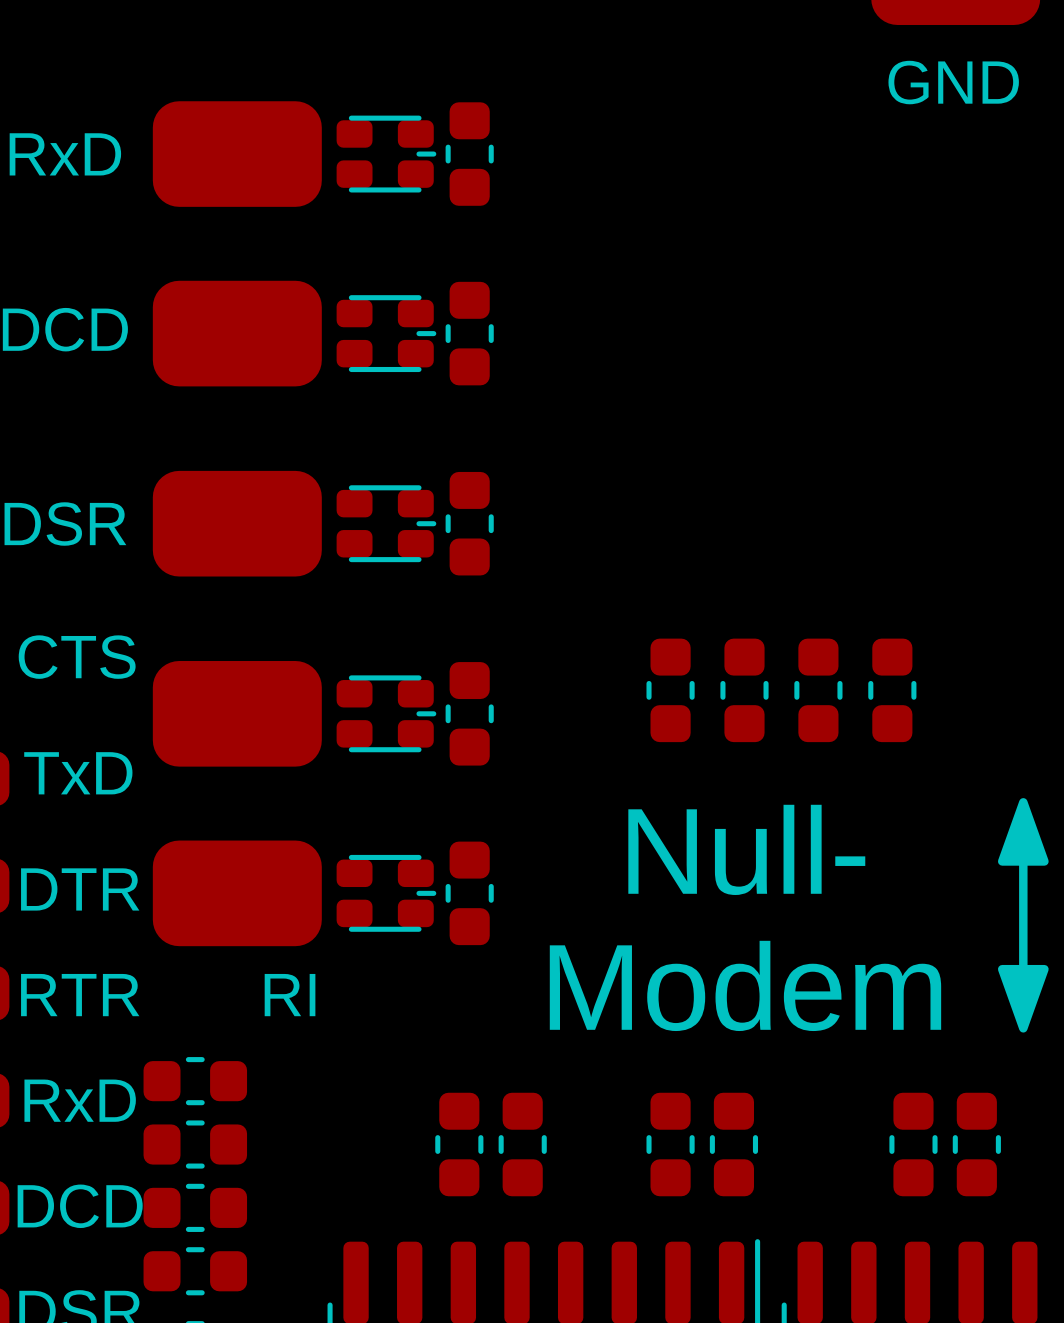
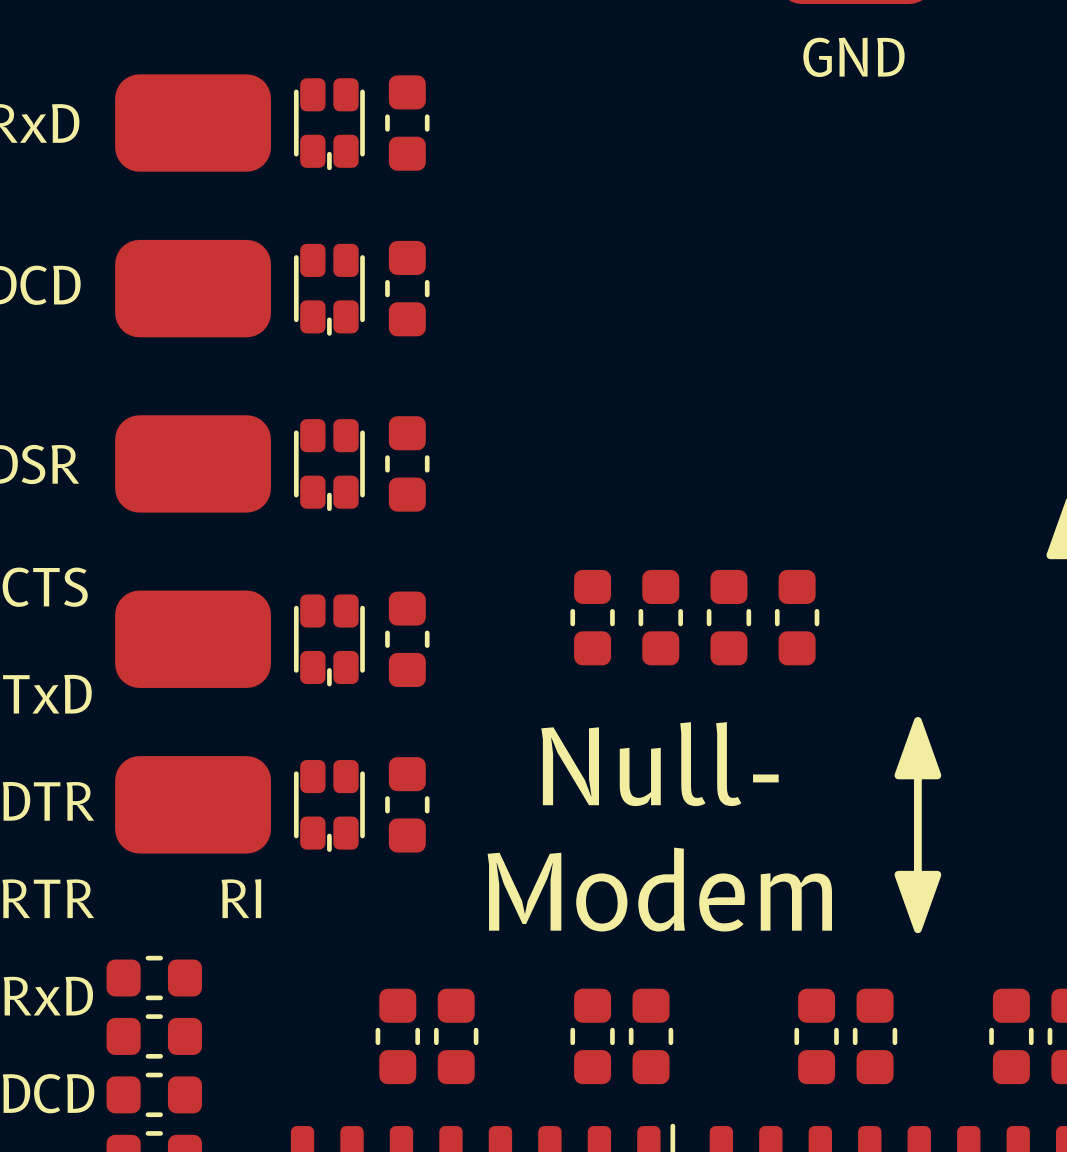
part footprint: [336, 115, 437, 193] -> [293, 78, 365, 171]
part footprint: [336, 295, 437, 373] -> [293, 243, 365, 336]
part footprint: [336, 485, 437, 563] -> [293, 419, 365, 512]
part footprint: [336, 675, 437, 753] -> [293, 594, 365, 687]
part footprint: [336, 854, 437, 932] -> [293, 760, 365, 852]

